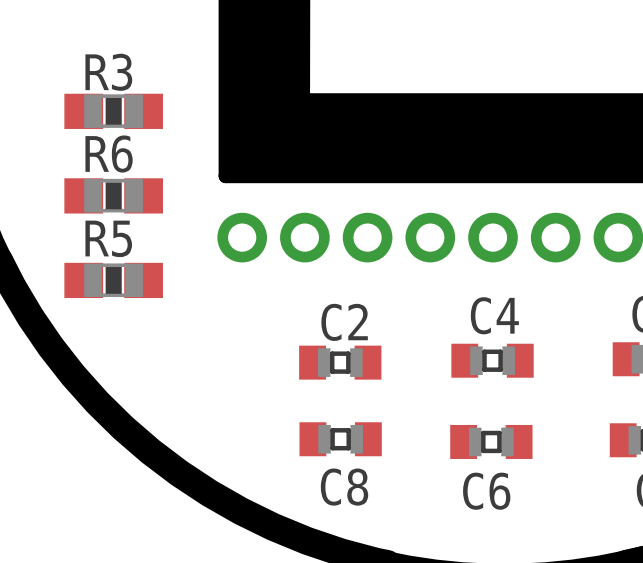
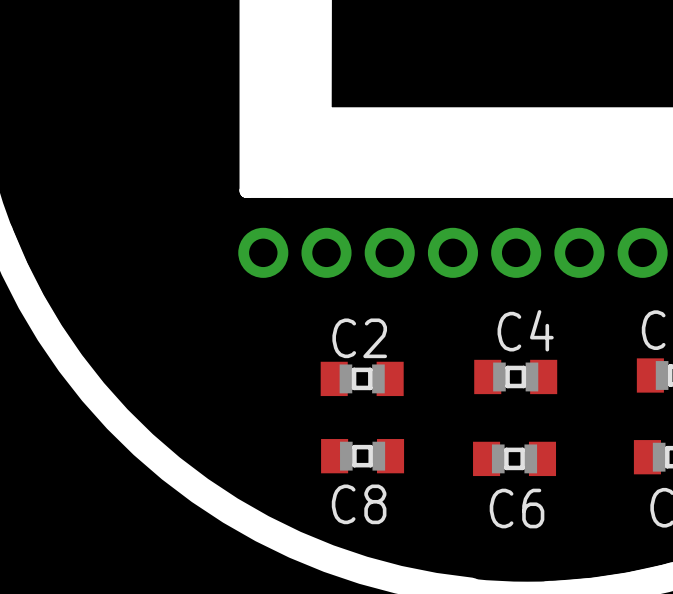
R3: (113, 111) -> none
R6: (113, 195) -> none
R5: (113, 280) -> none

